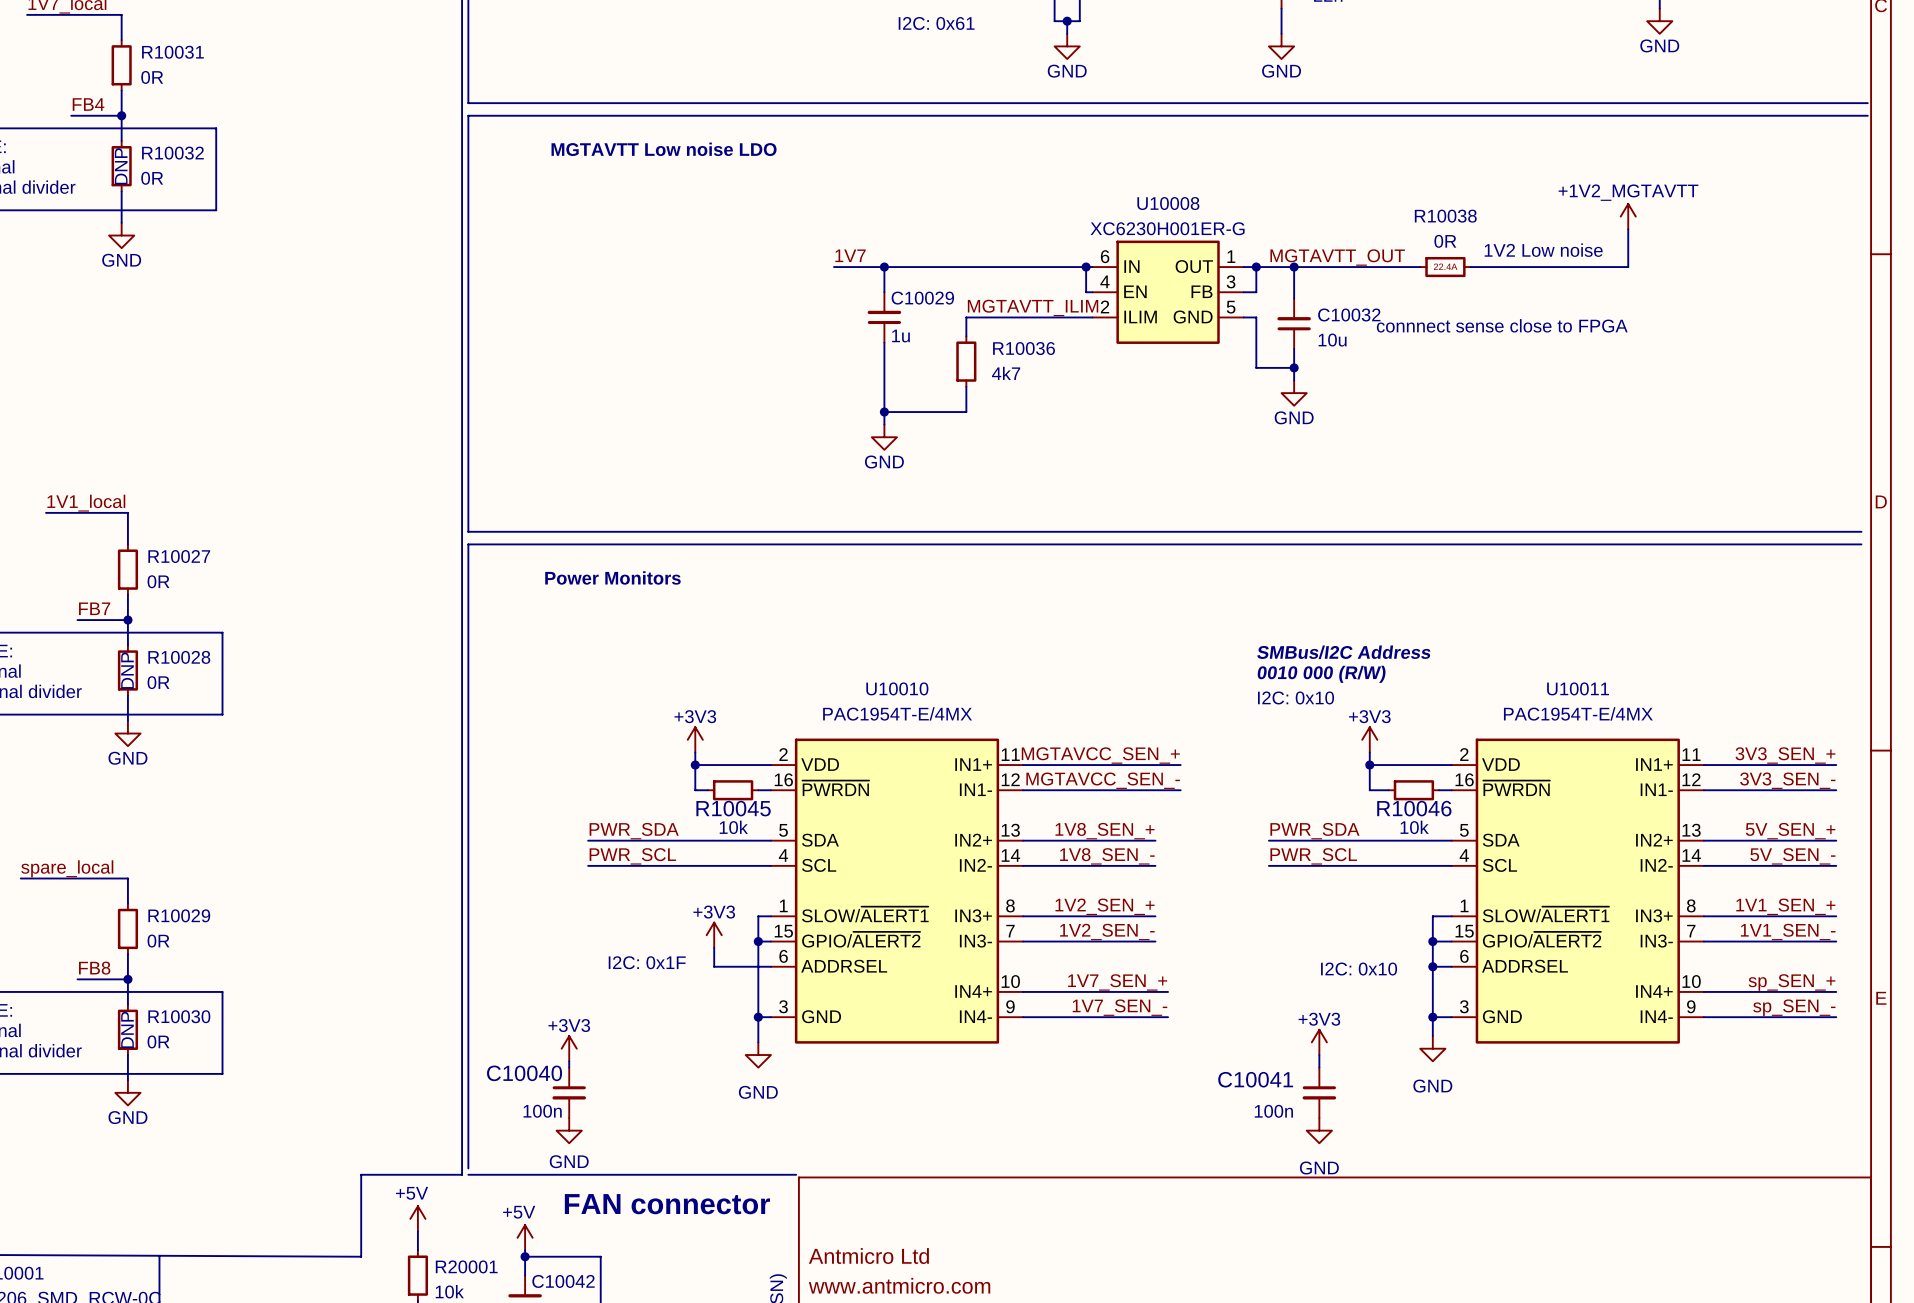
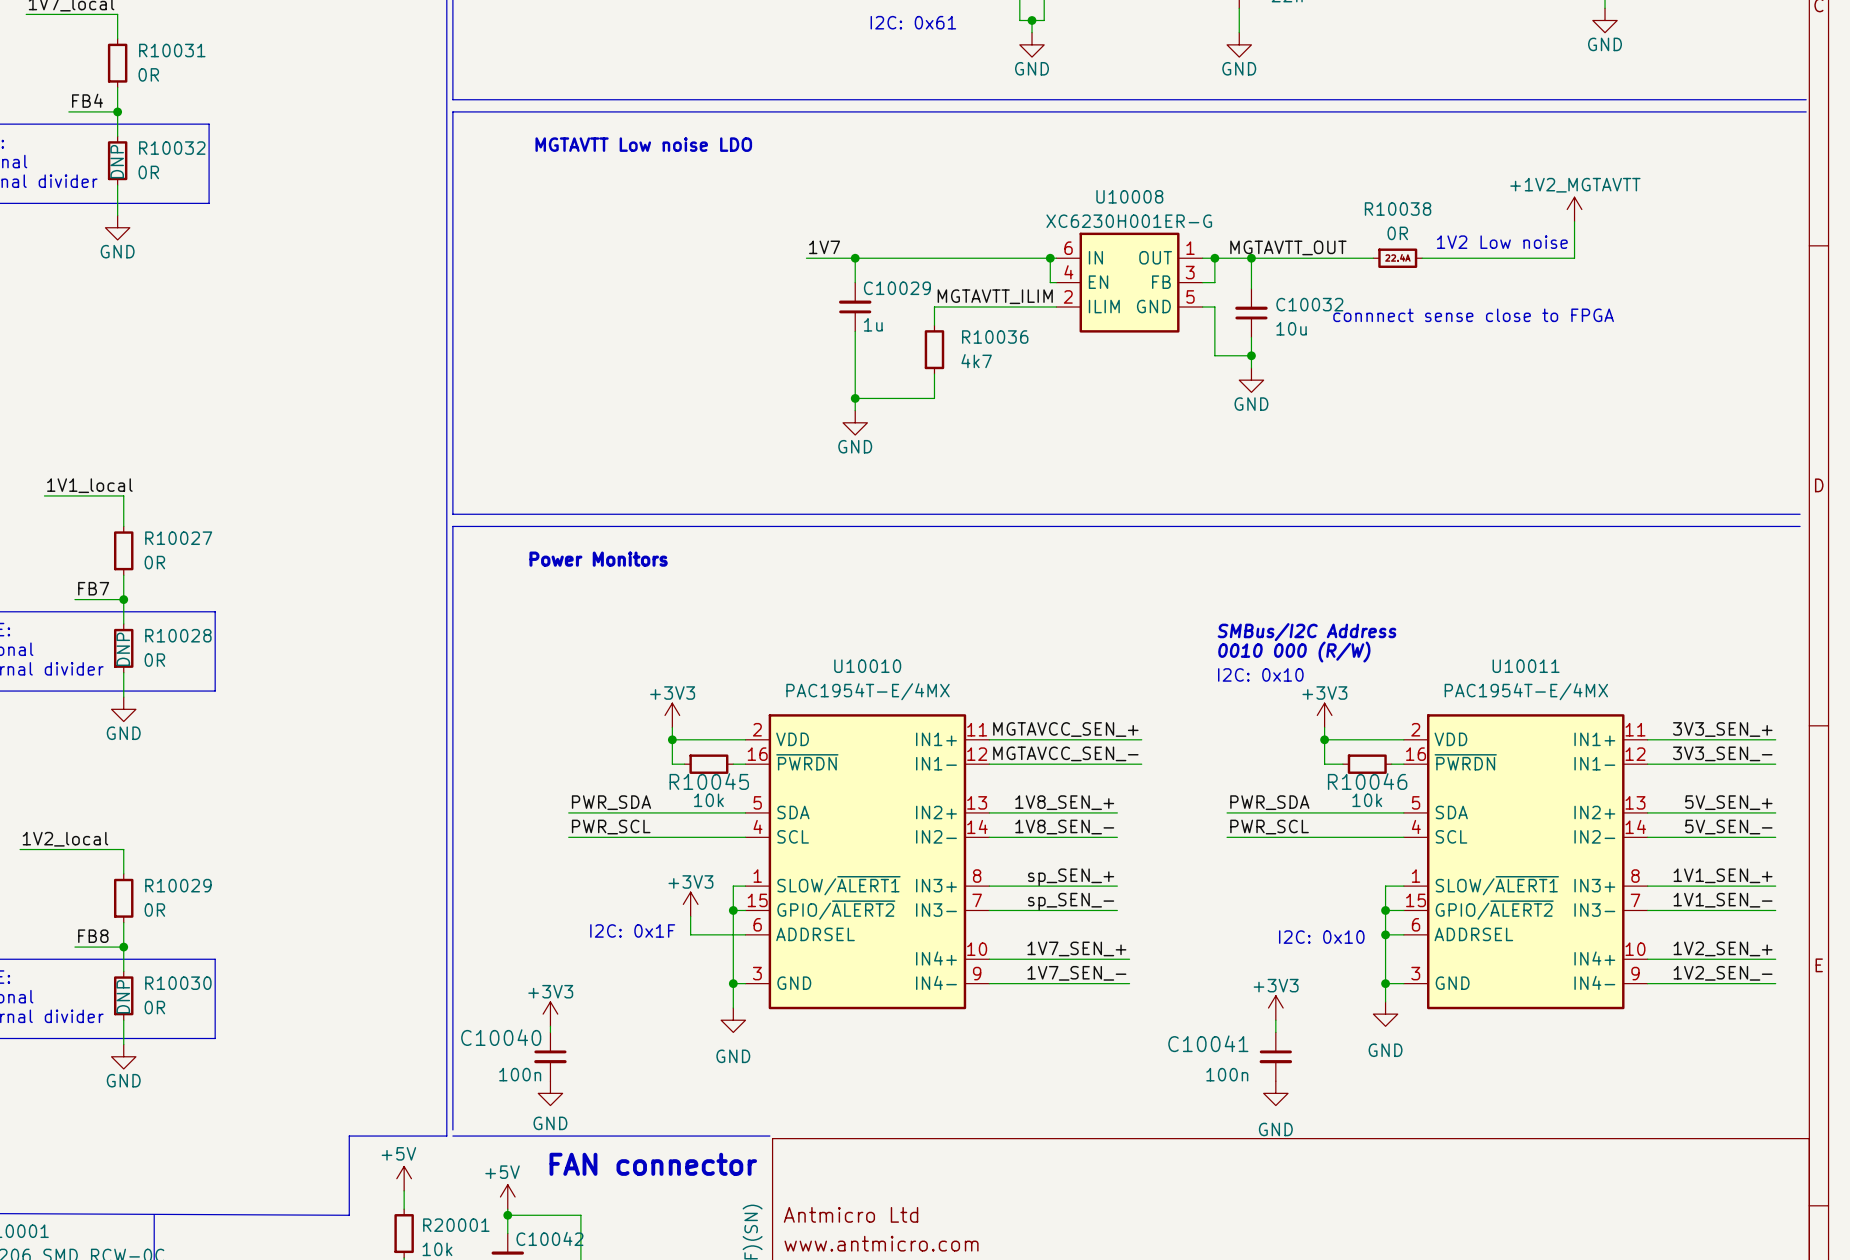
label: spare_local (67, 868) -> 1V2_local (65, 839)
label: 1V2_SEN_+ (1105, 906) -> sp_SEN_+ (1071, 877)
label: 1V2_SEN_- (1107, 932) -> sp_SEN_- (1071, 901)
label: sp_SEN_+ (1792, 982) -> 1V2_SEN_+ (1723, 948)
label: sp_SEN_- (1794, 1007) -> 1V2_SEN_- (1723, 973)

